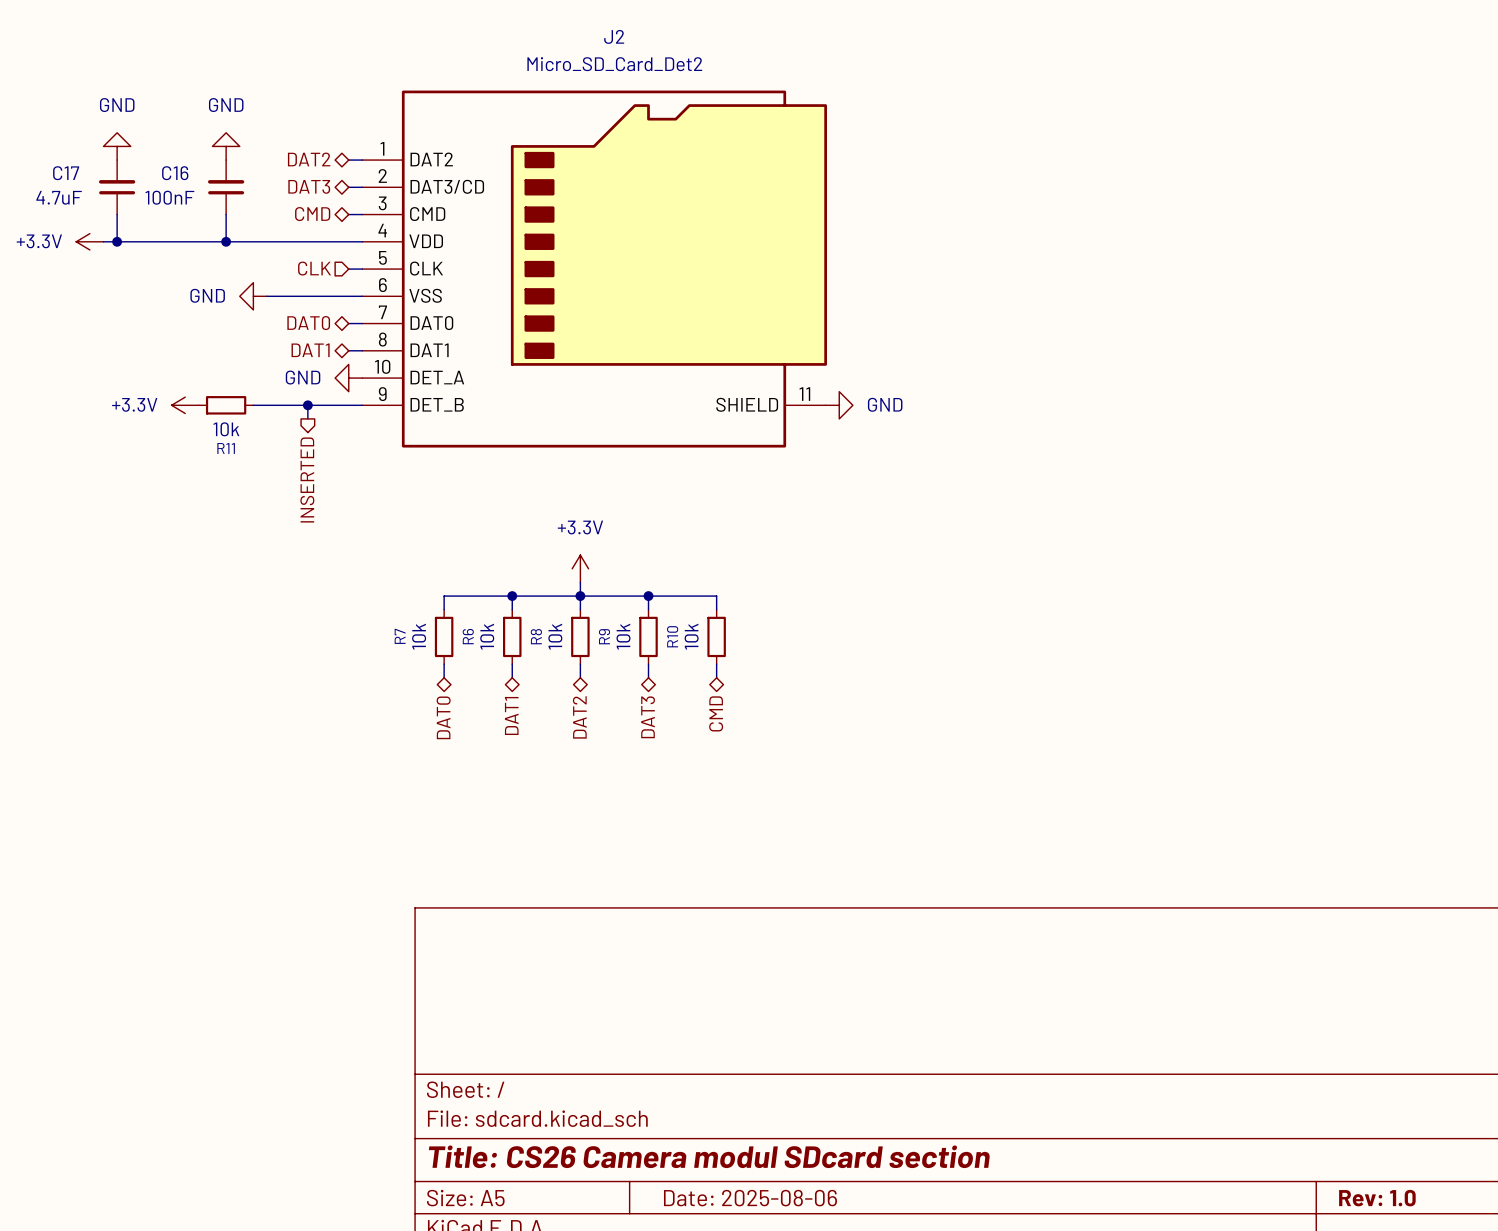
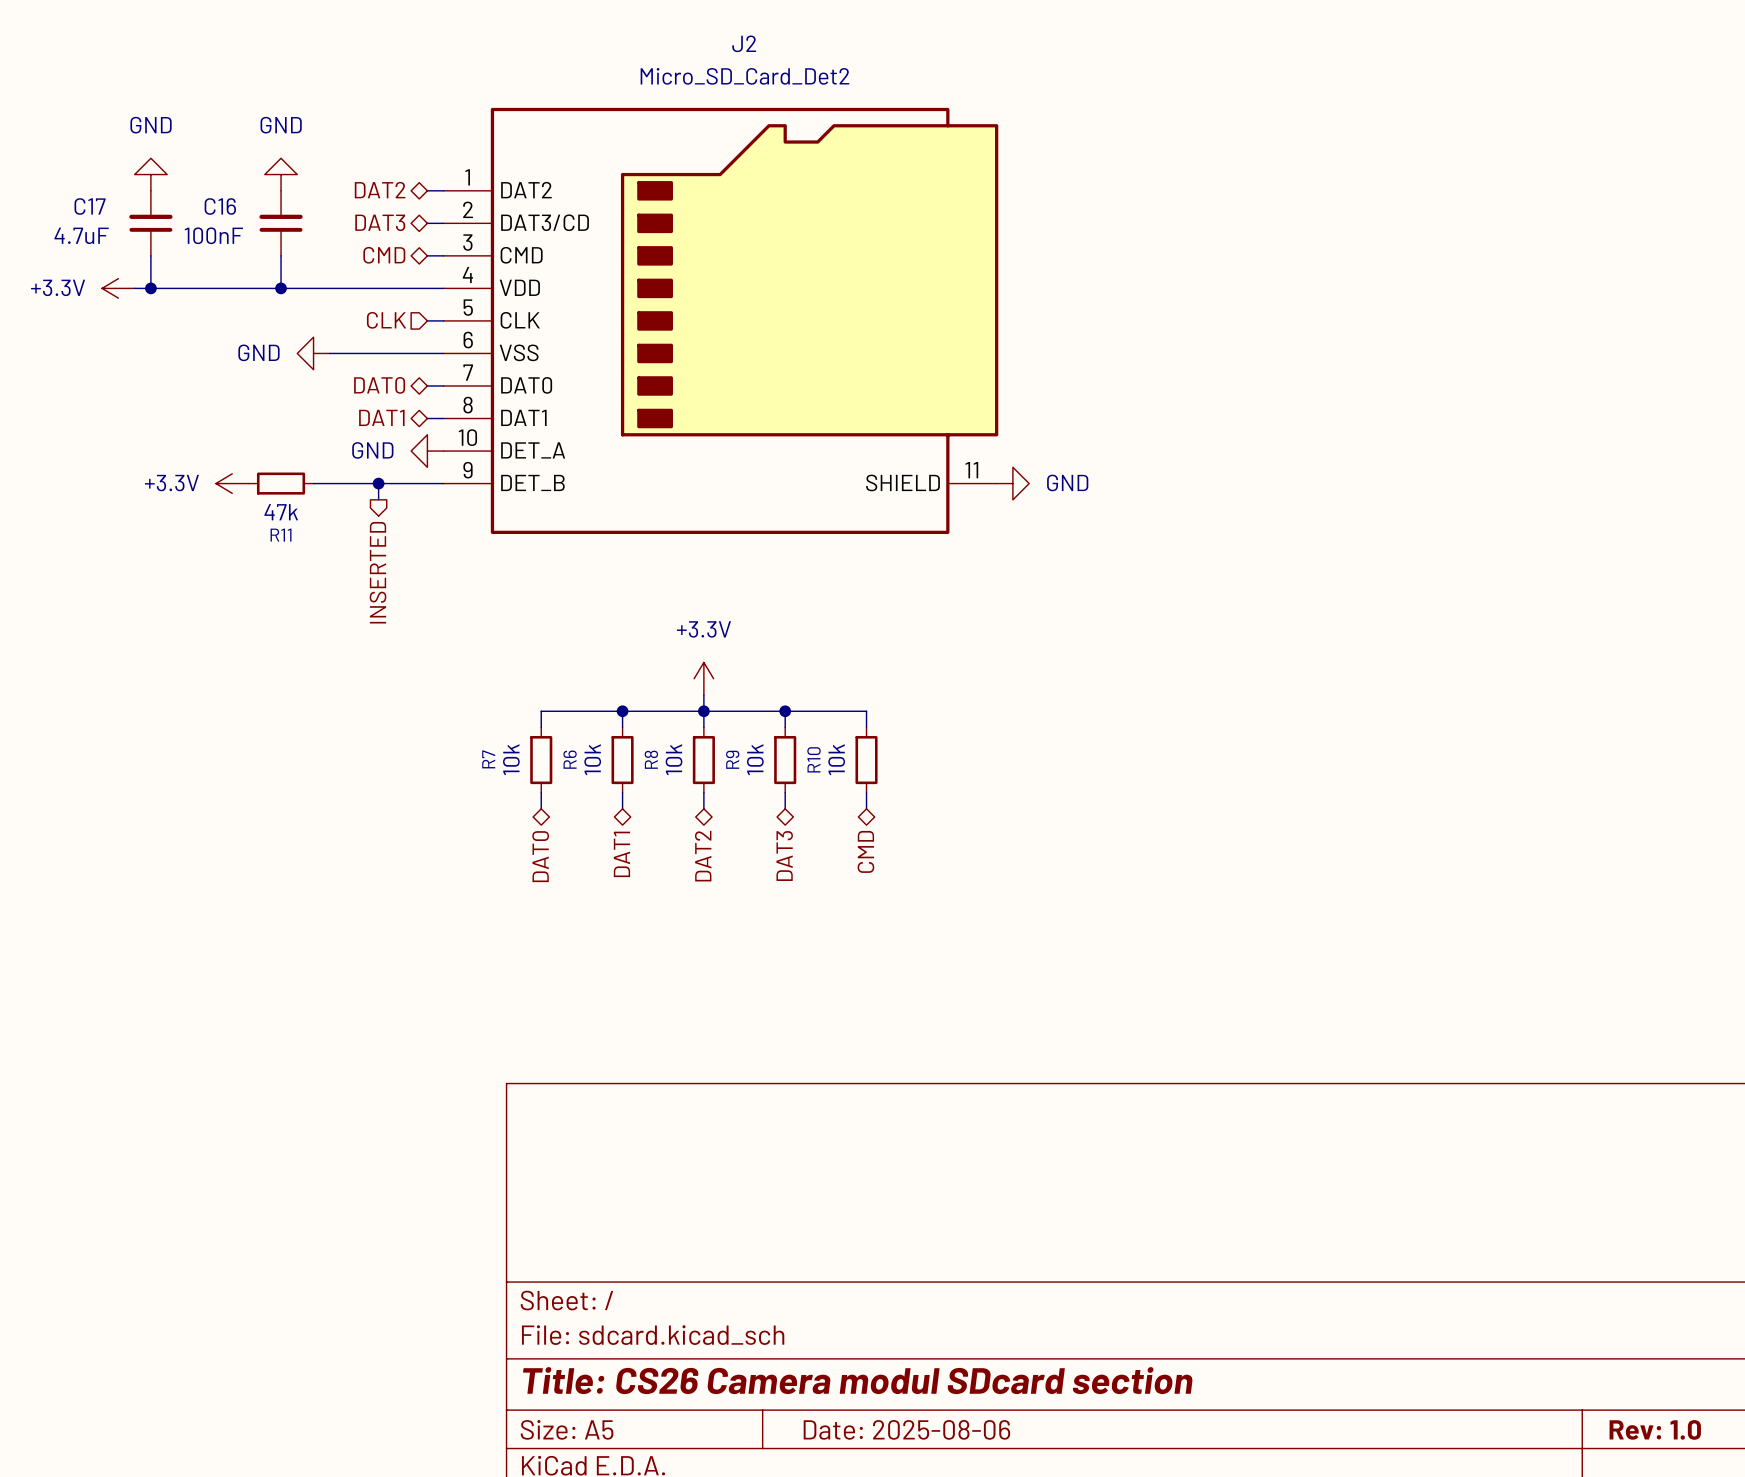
R11 value: 10k (226, 429) -> 47k (281, 512)

